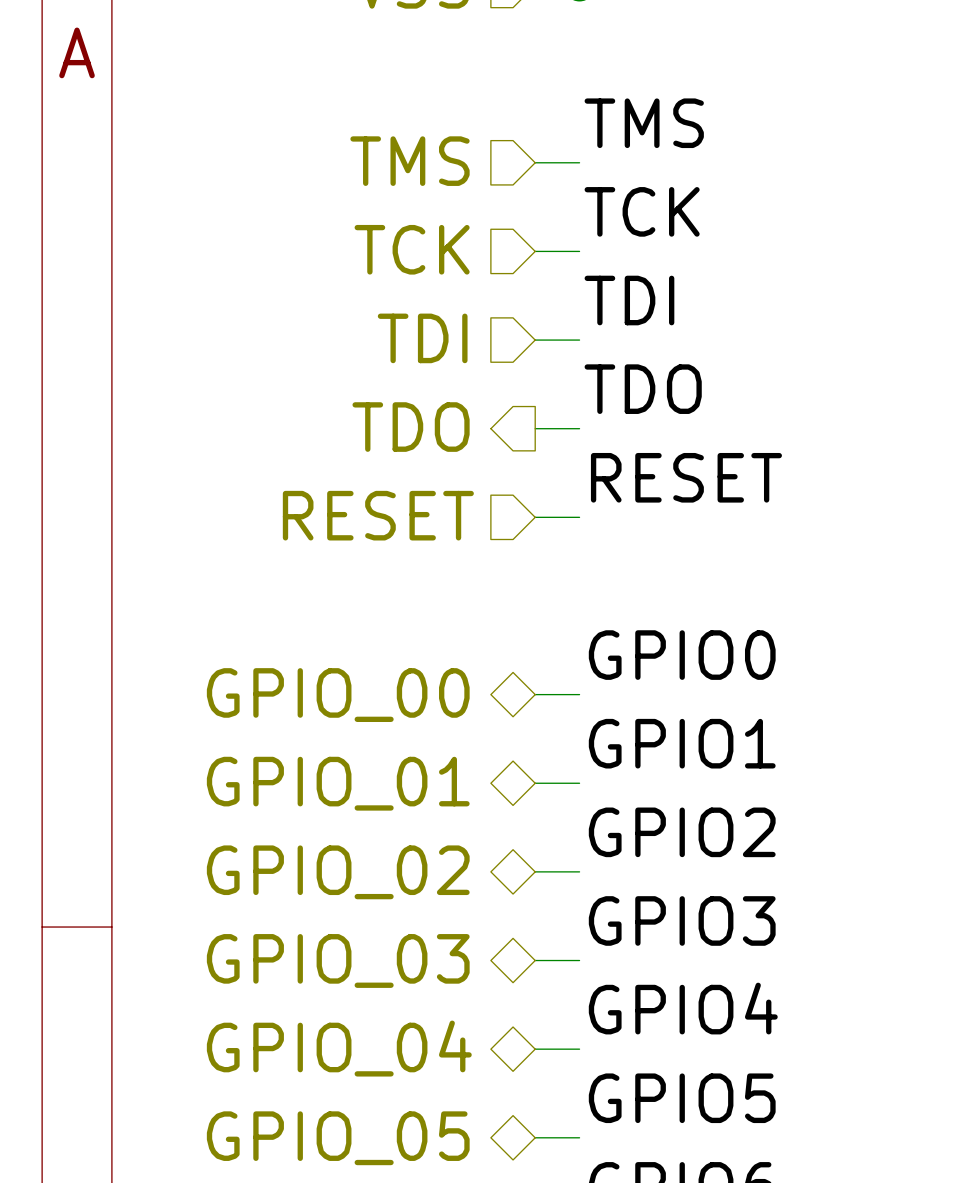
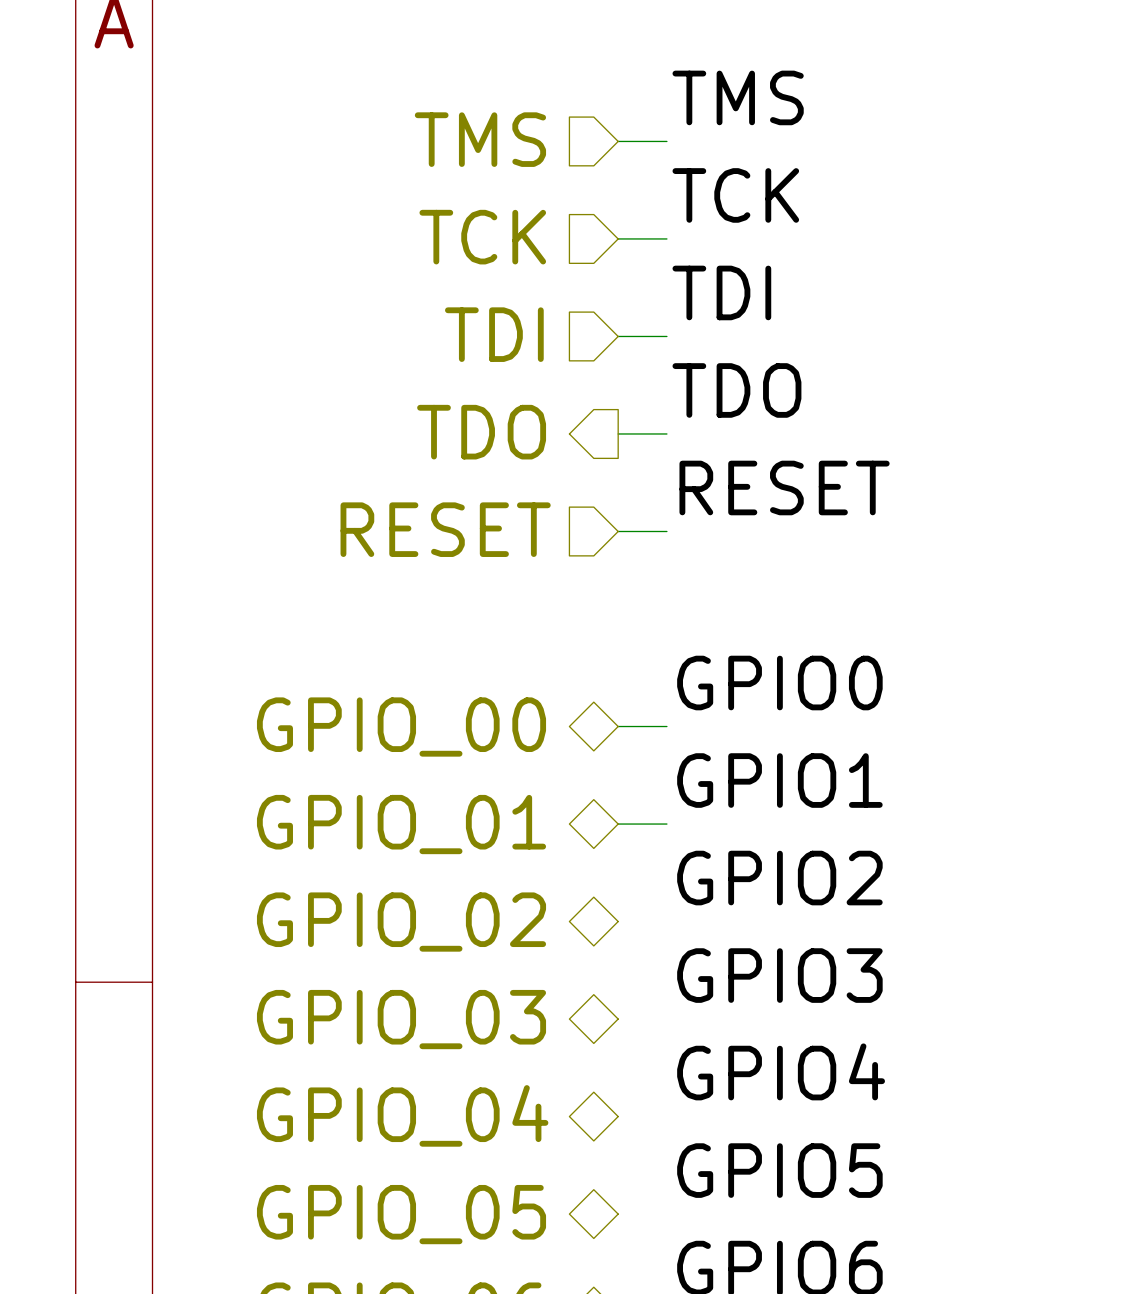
wire: (535, 871) (579, 871) -> none
wire: (535, 960) (579, 960) -> none
wire: (535, 1049) (579, 1049) -> none
wire: (535, 1137) (579, 1137) -> none

